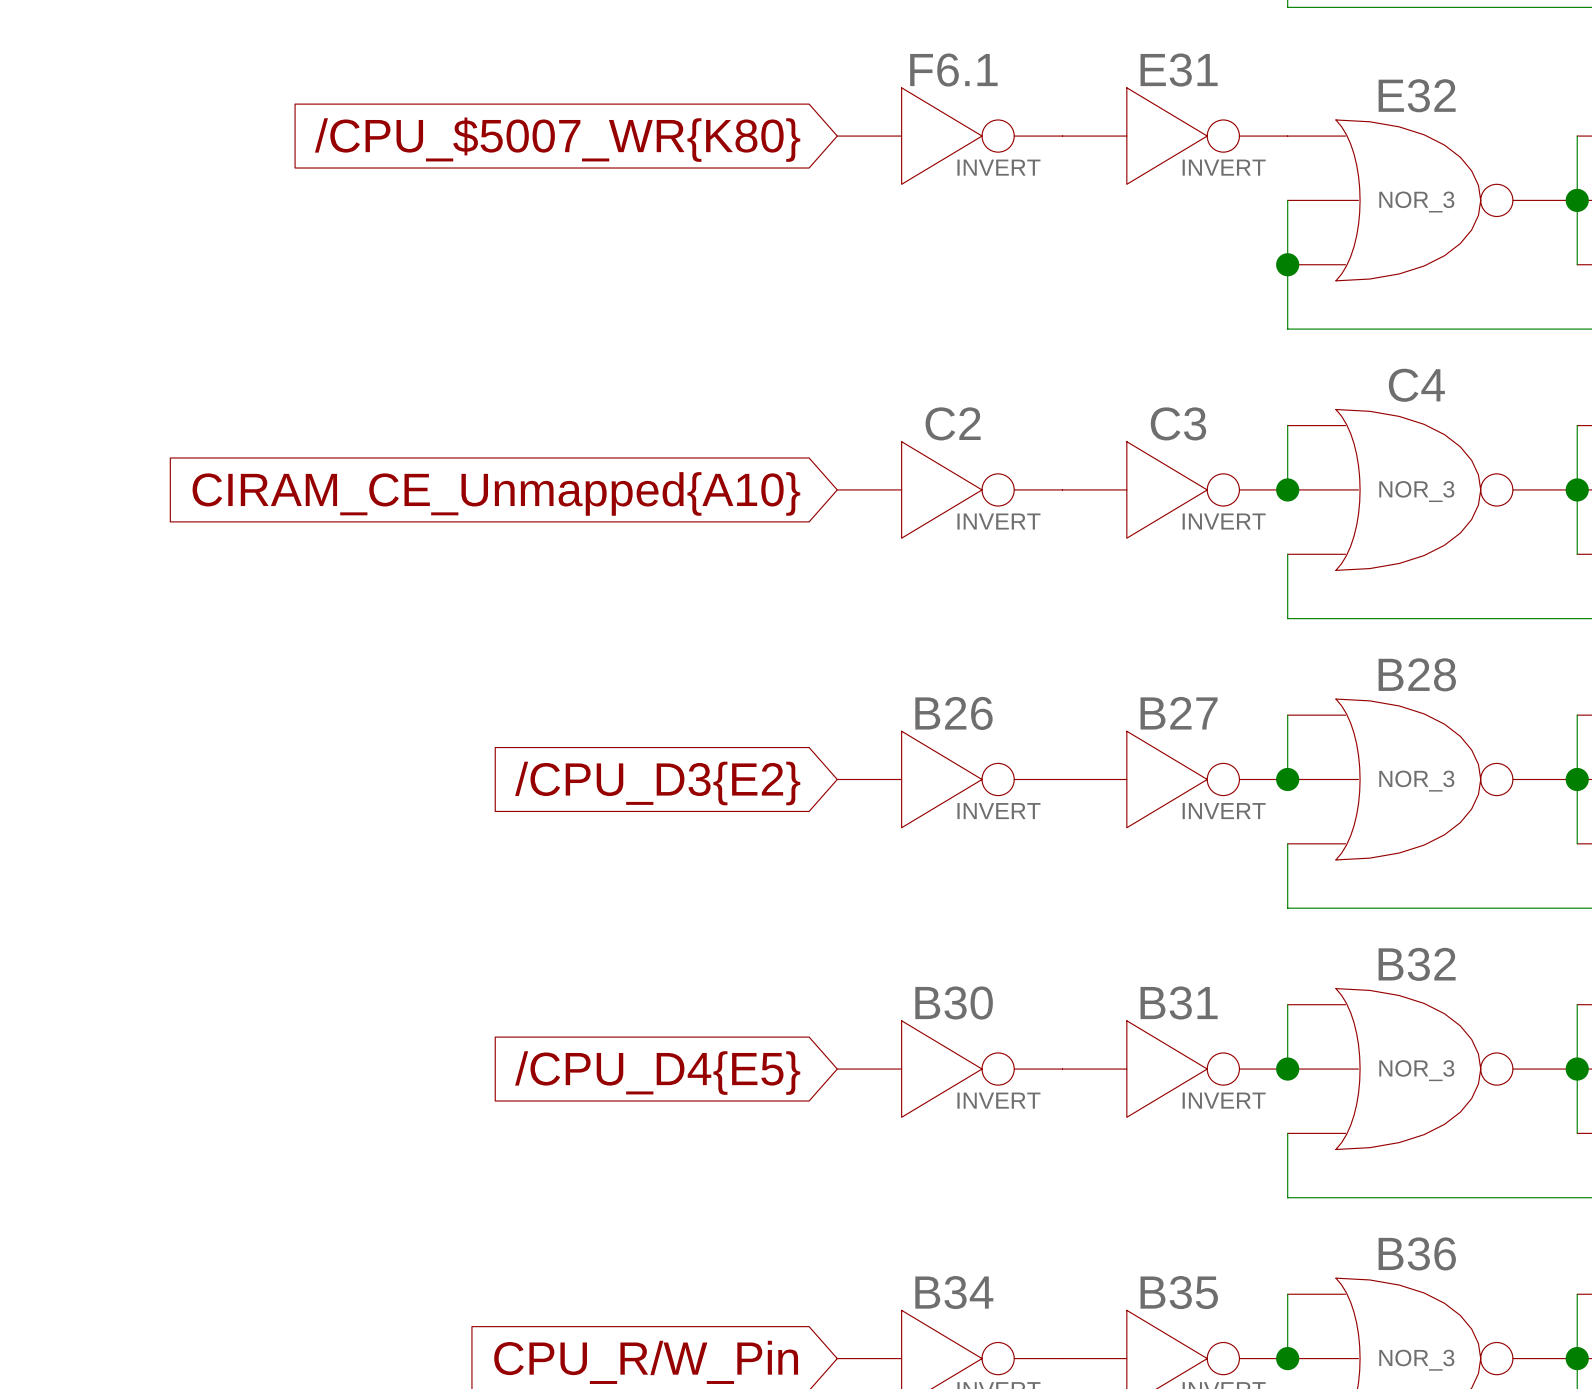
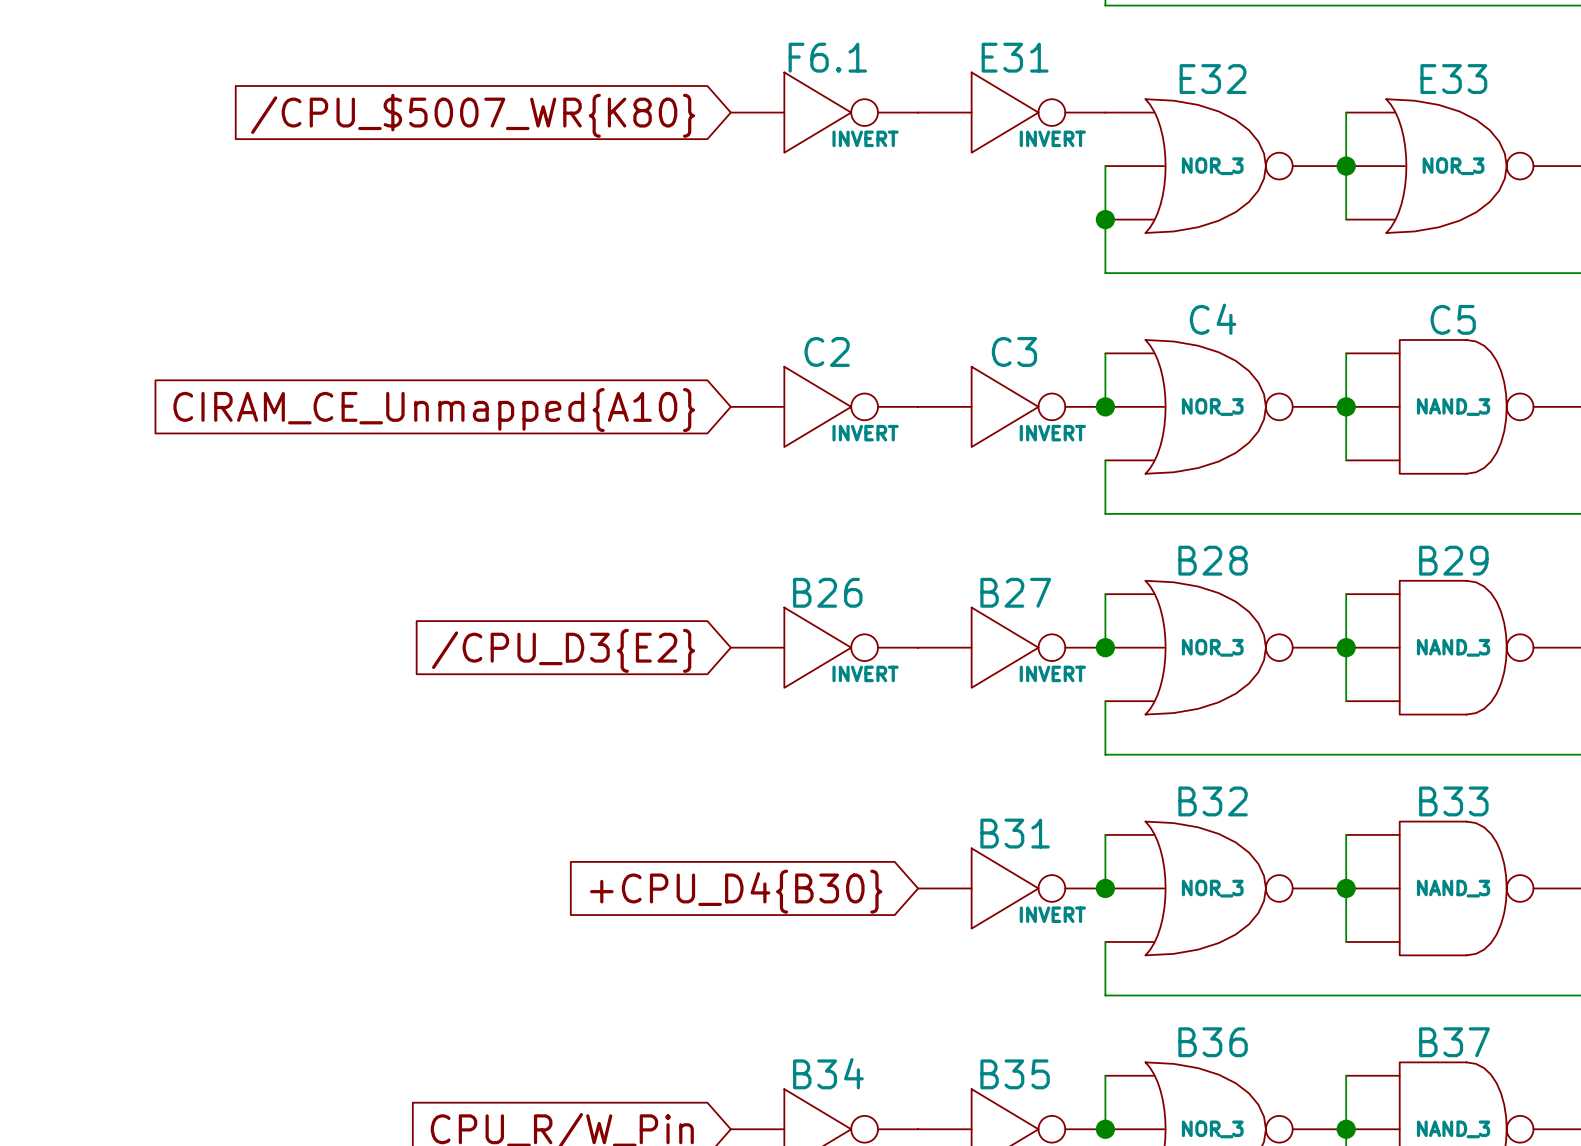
B30: INVERT (949, 1069) -> none
global label: /CPU_D4{E5} (657, 1073) -> +CPU_D4{B30} (736, 891)

